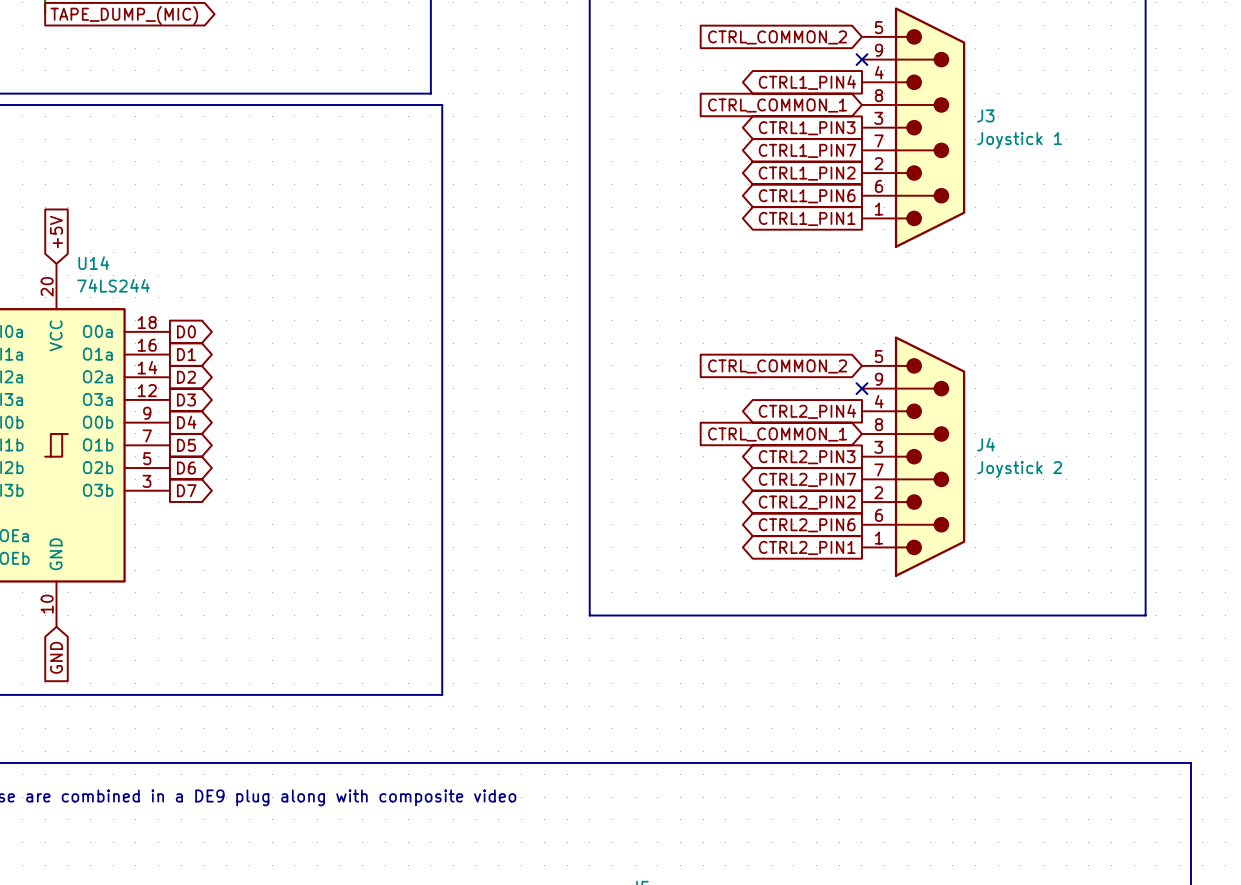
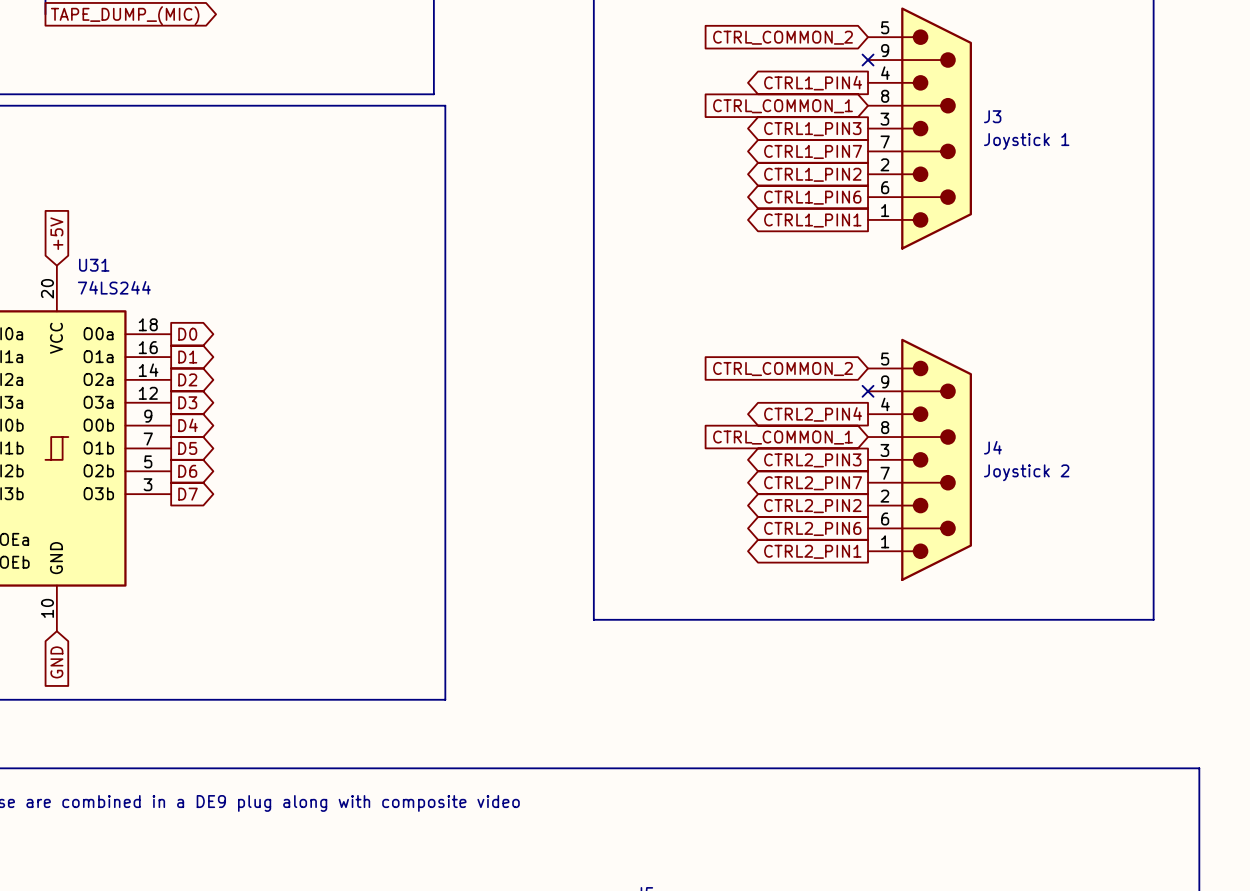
U14 name: U14 (93, 263) -> U31 (94, 265)

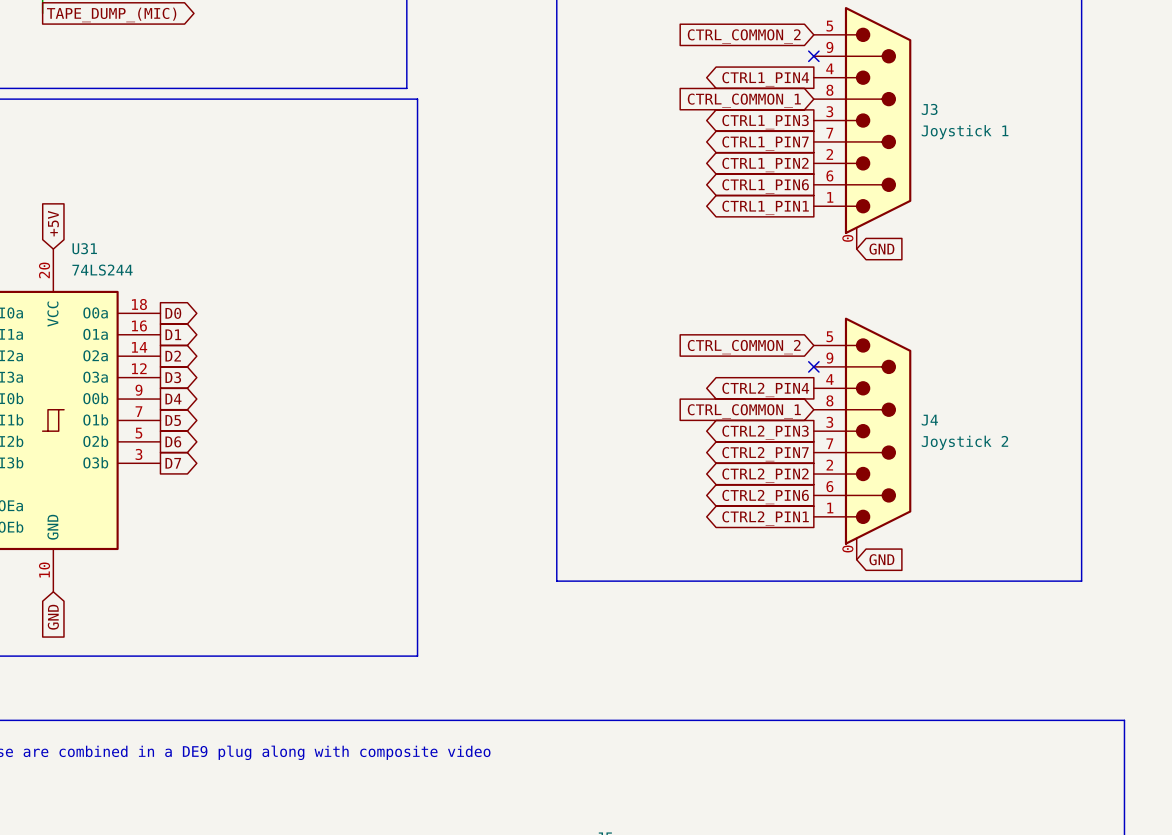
J3 symbol: [868, 7, 972, 250] -> [813, 7, 912, 250]
global label: none -> GND (881, 249)
J4 symbol: [868, 338, 972, 581] -> [813, 317, 912, 560]
global label: none -> GND (881, 559)

